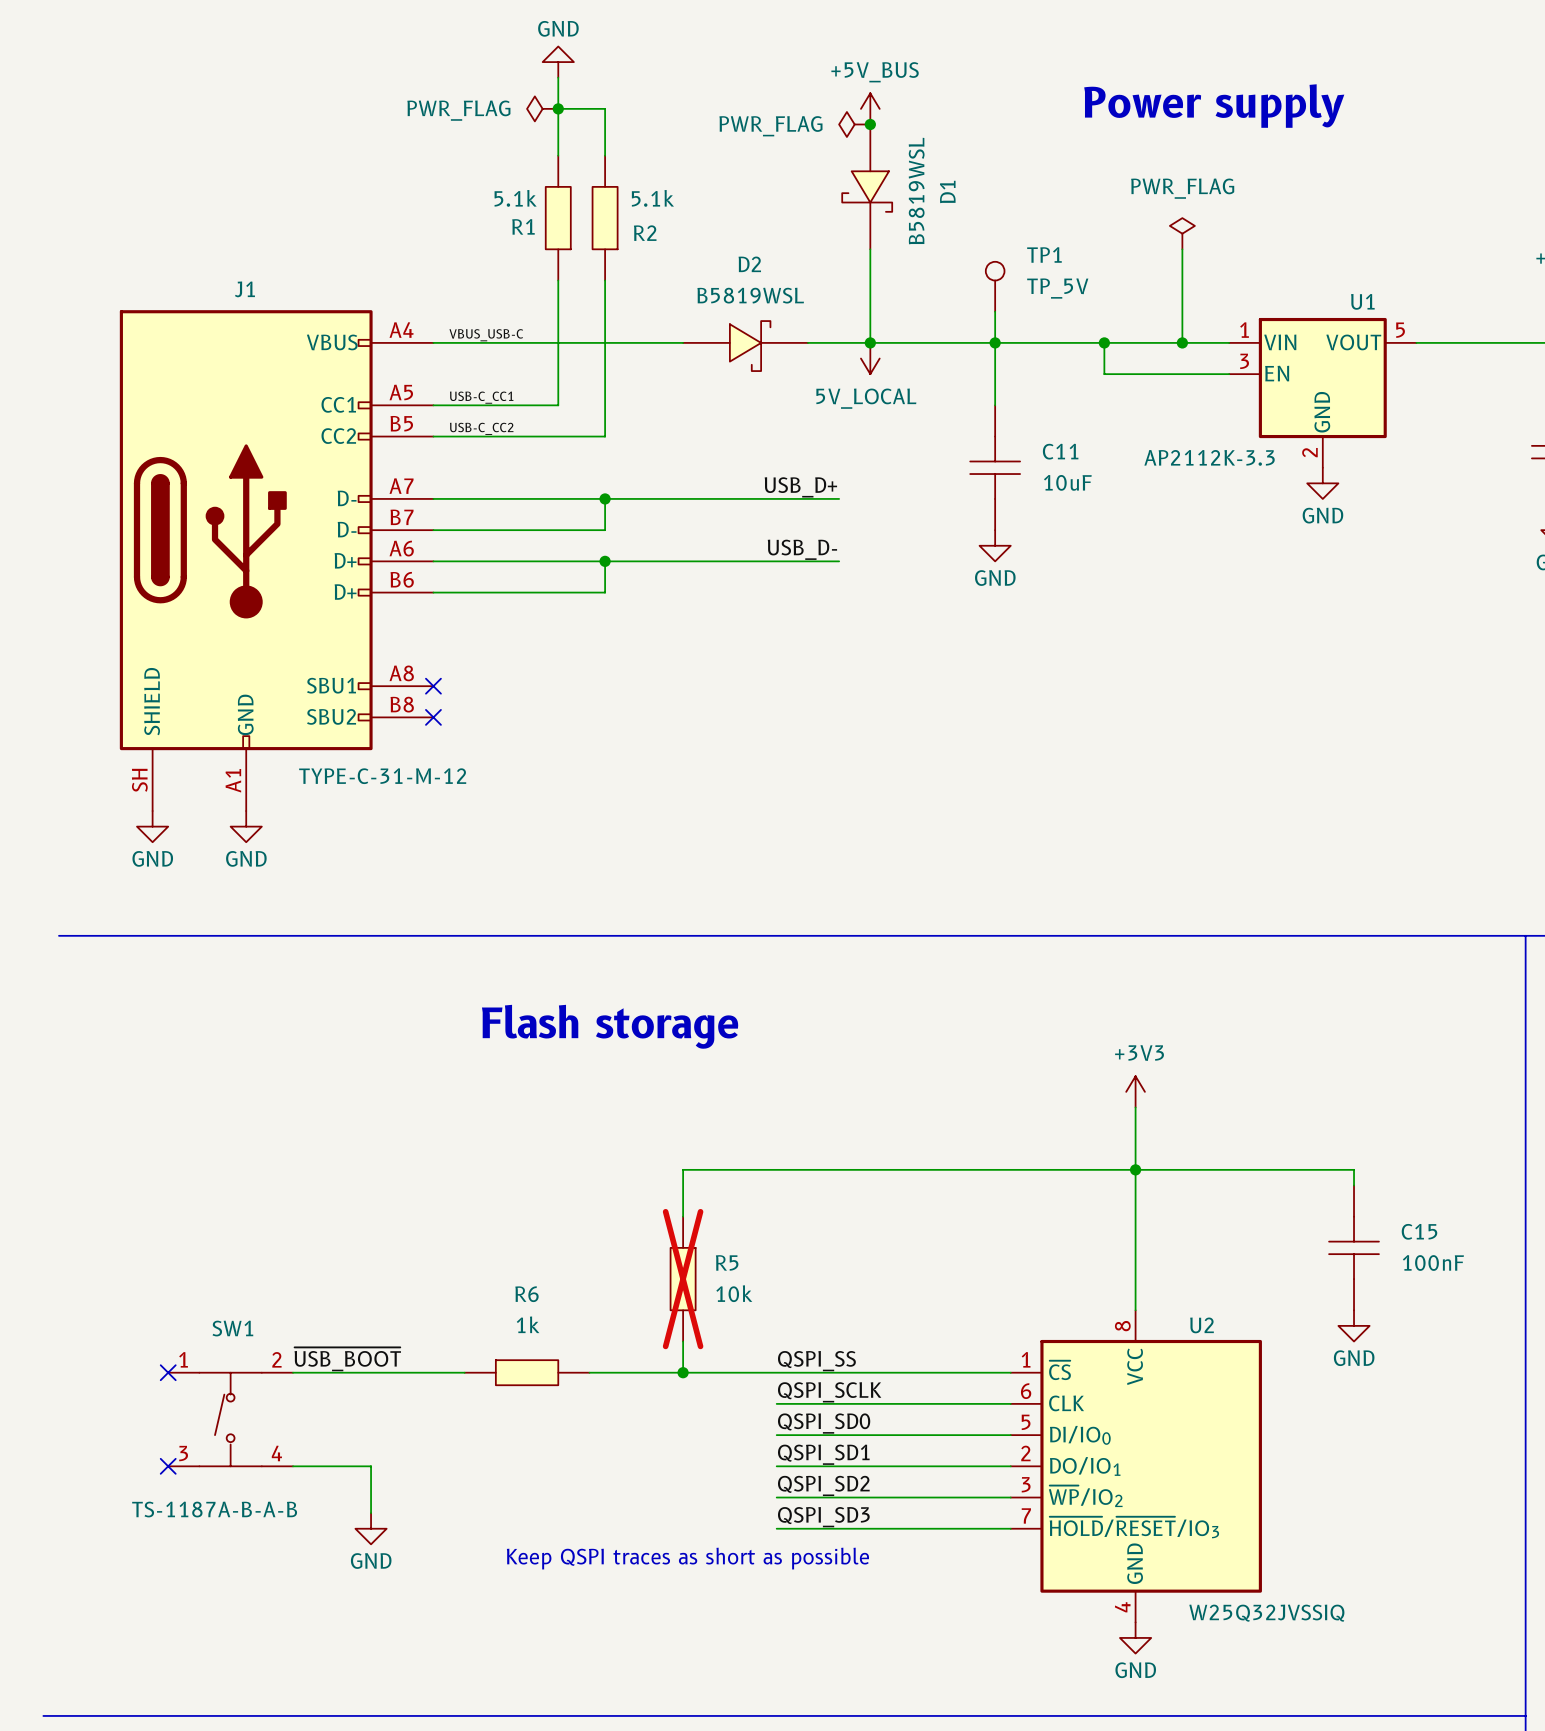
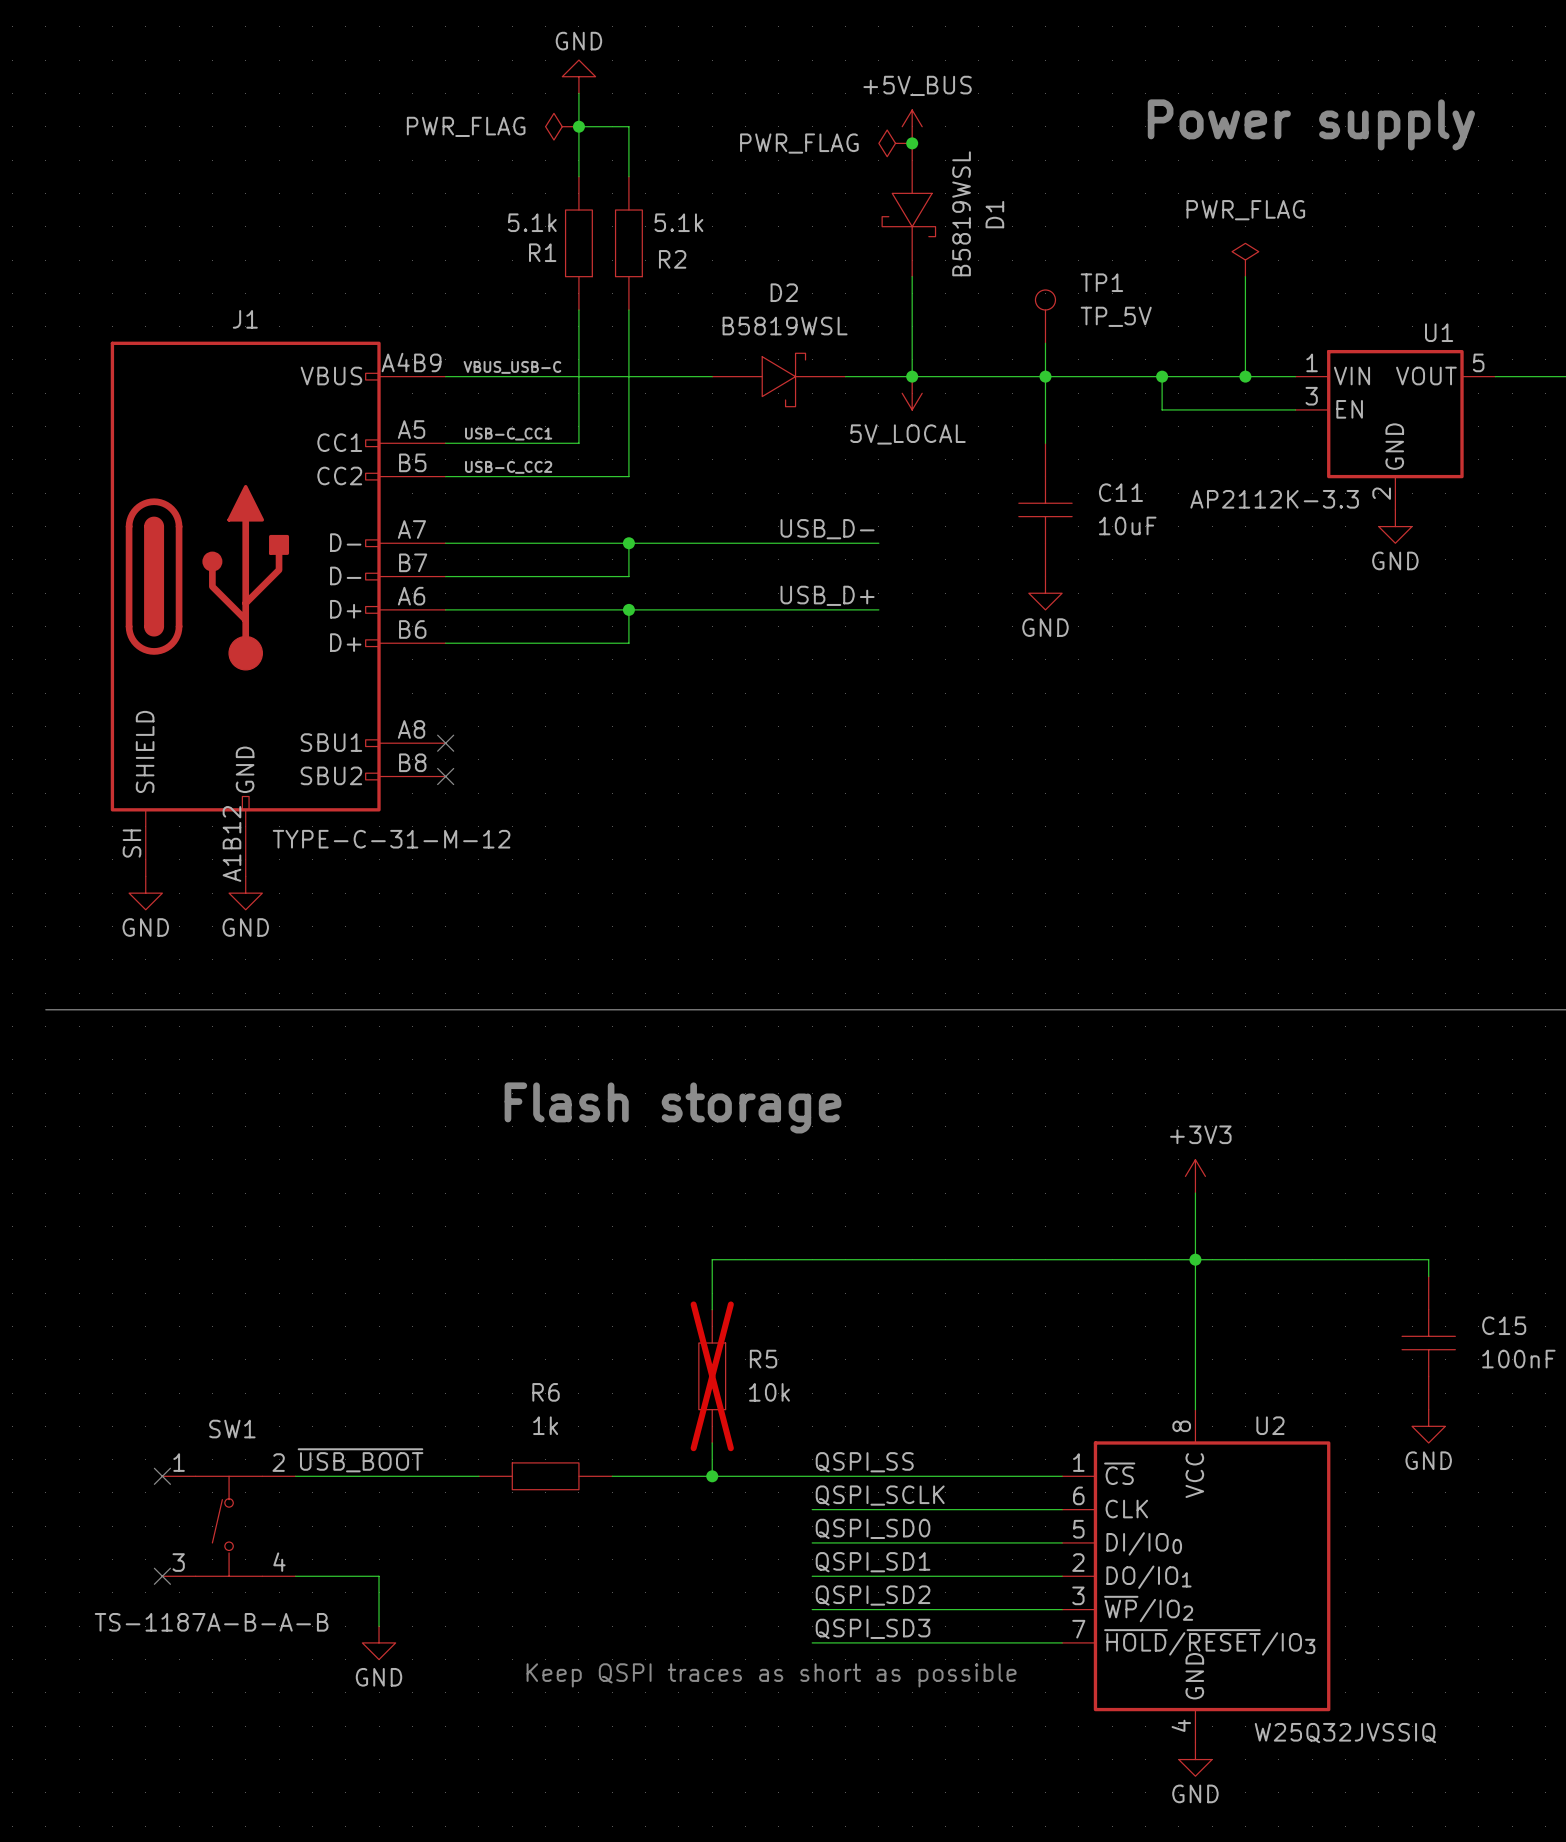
J1 pin number: A4 (401, 330) -> A4B9 (411, 362)
label: USB_D+ (800, 487) -> USB_D- (827, 529)
label: USB_D- (802, 549) -> USB_D+ (827, 595)
J1 pin number: A1 (233, 780) -> A1B12 (231, 843)

